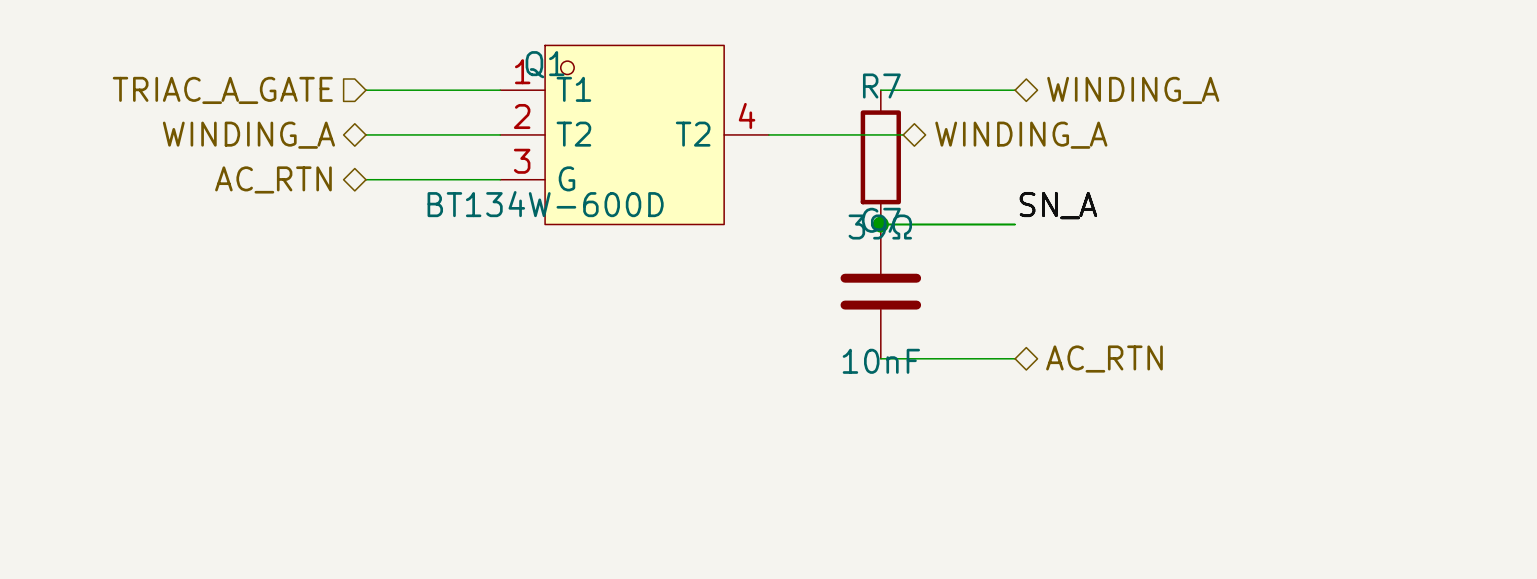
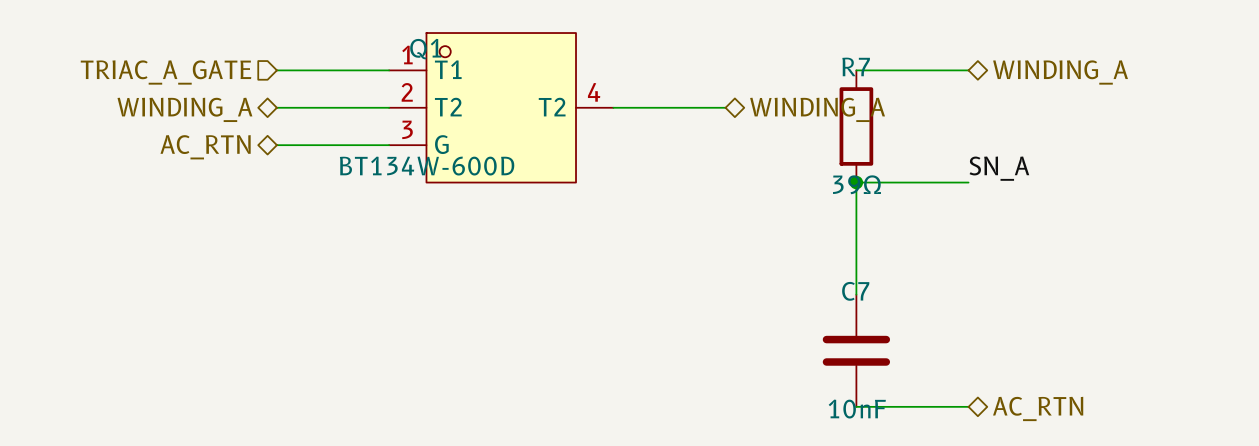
wire: (880, 90) (1015, 90) -> (856, 70) (968, 70)
hierarchical label position: WINDING_A (1133, 90) -> WINDING_A (1060, 72)
R7 position: (880, 157) -> (856, 126)
label position: SN_A (1058, 205) -> SN_A (999, 168)
wire: (880, 224) (1015, 224) -> none
junction: (880, 224) -> none
junction: none -> (856, 182)
wire: none -> (968, 182) (856, 182) (856, 294)
C7 position: (880, 291) -> (856, 350)
wire: (880, 358) (1015, 358) -> (856, 406) (968, 406)
hierarchical label position: AC_RTN (1104, 359) -> AC_RTN (1038, 408)

